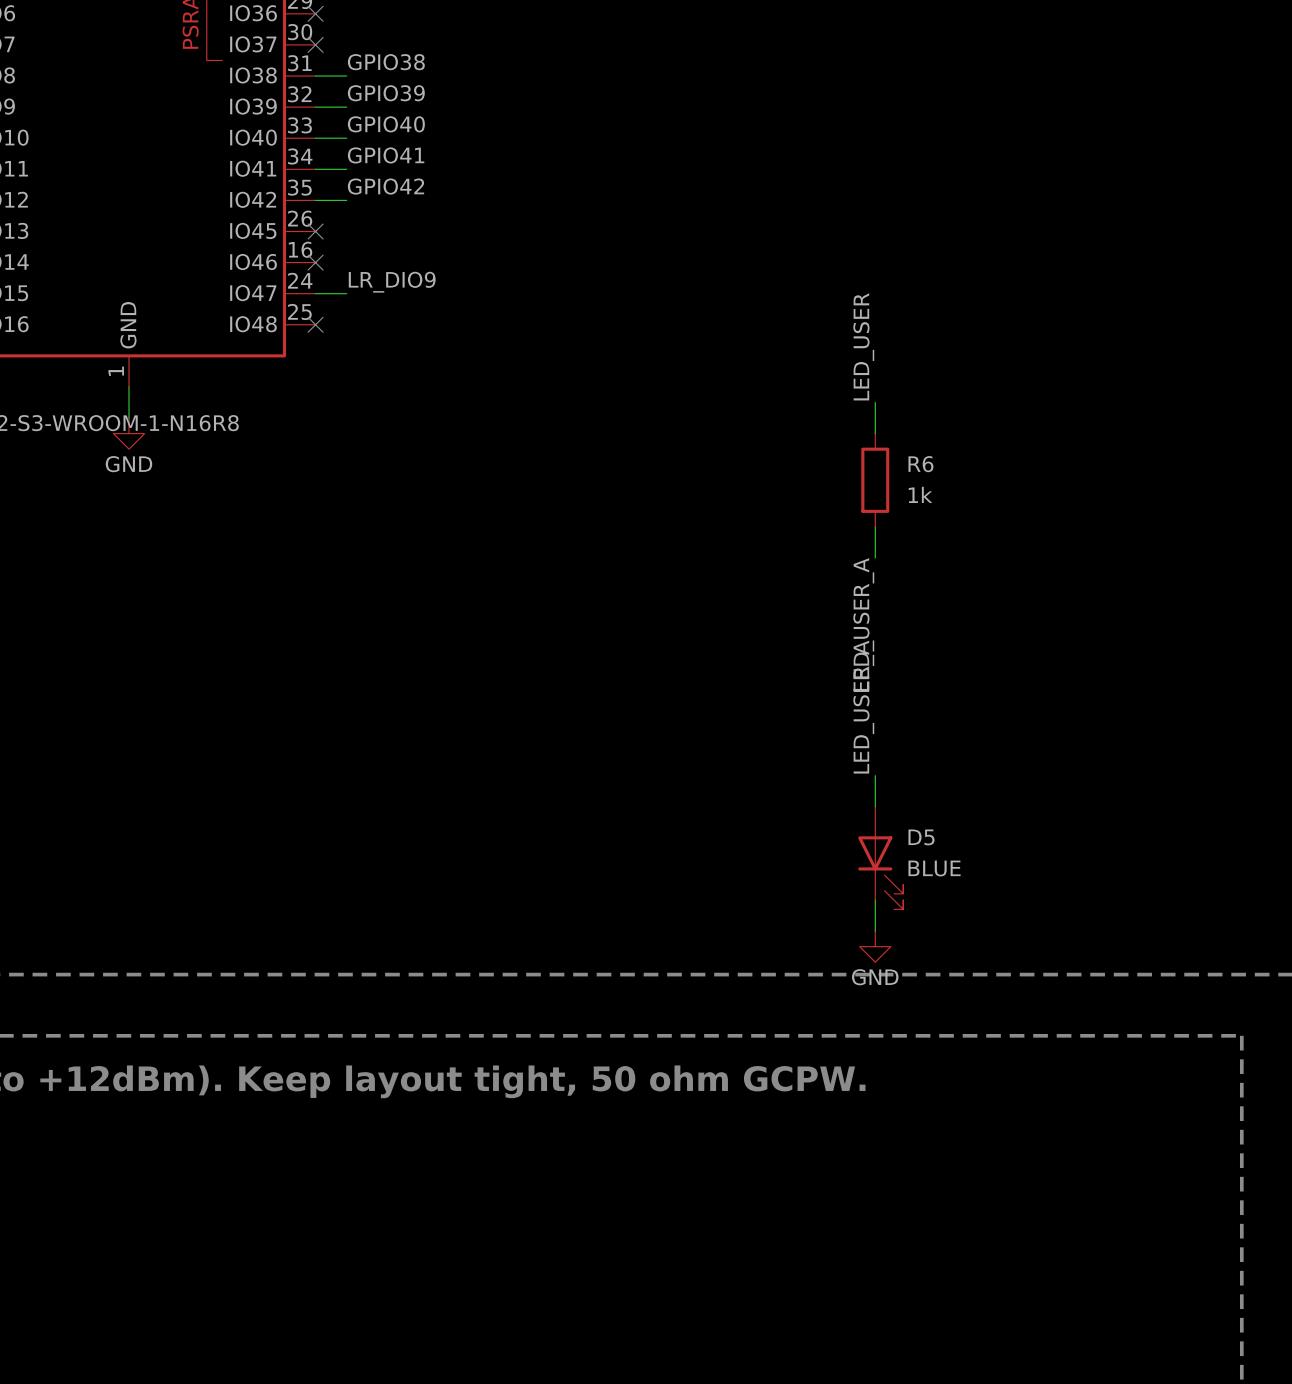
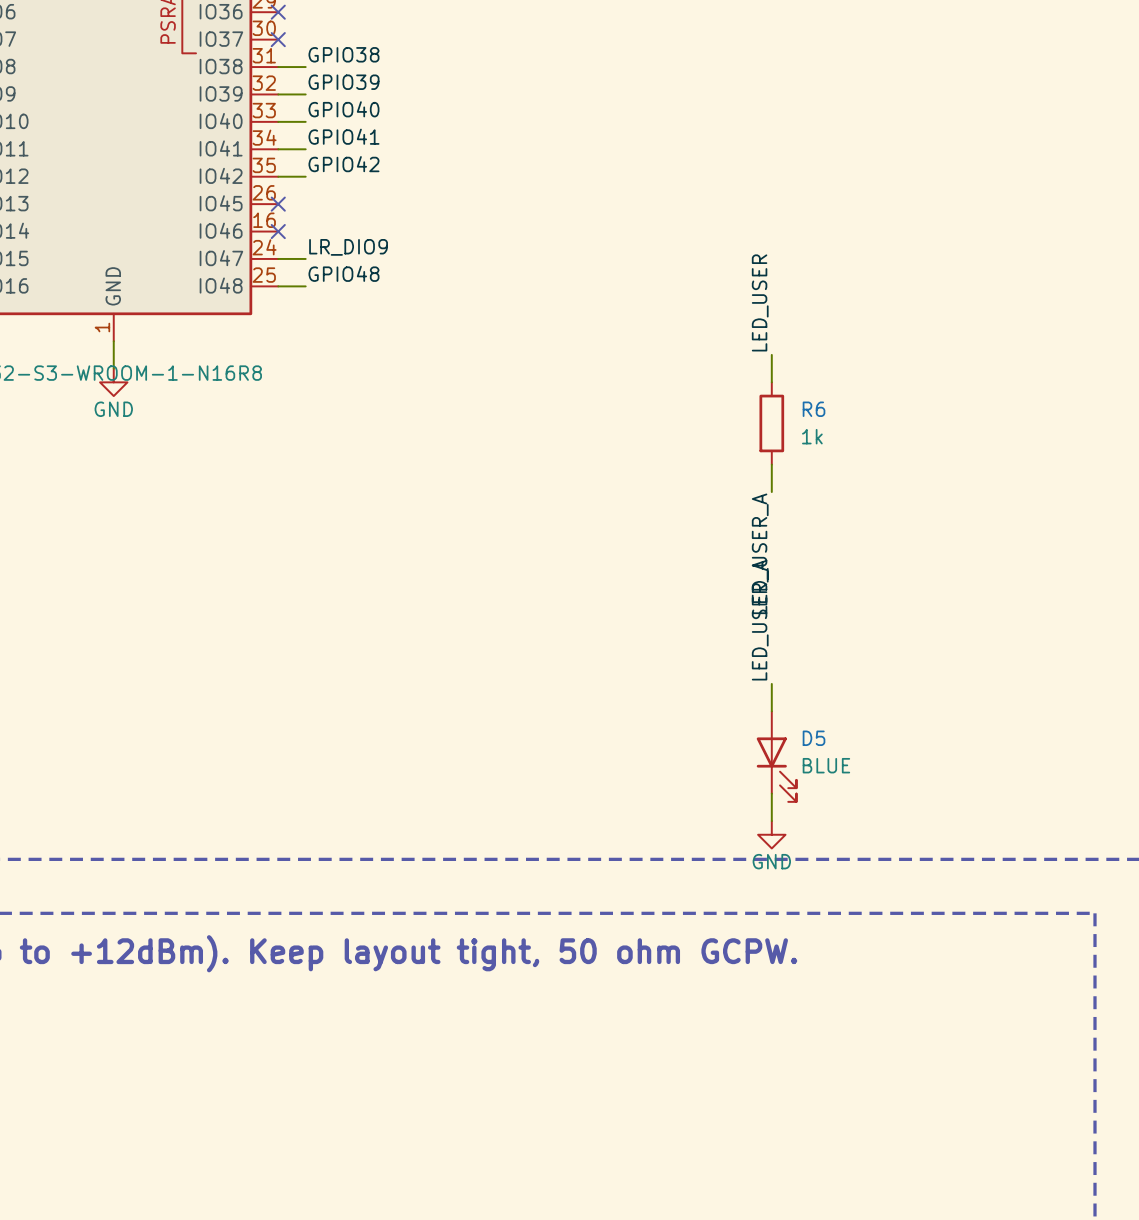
label: none -> GPIO48 (343, 273)
wire: none -> (278, 286) (305, 286)
no-connect mark: (315, 324) -> none

